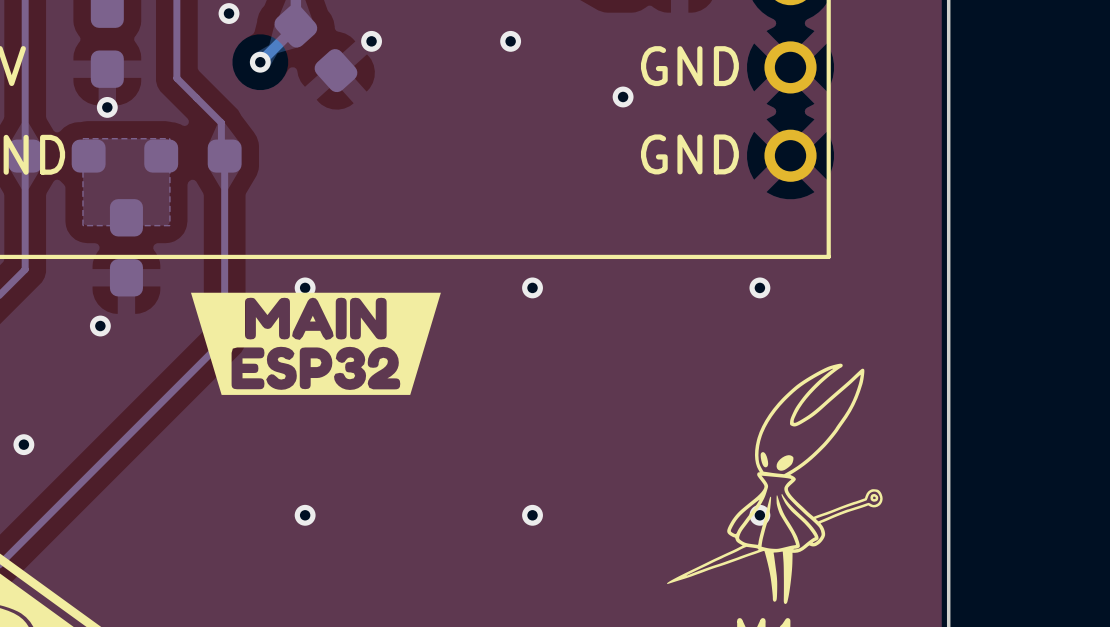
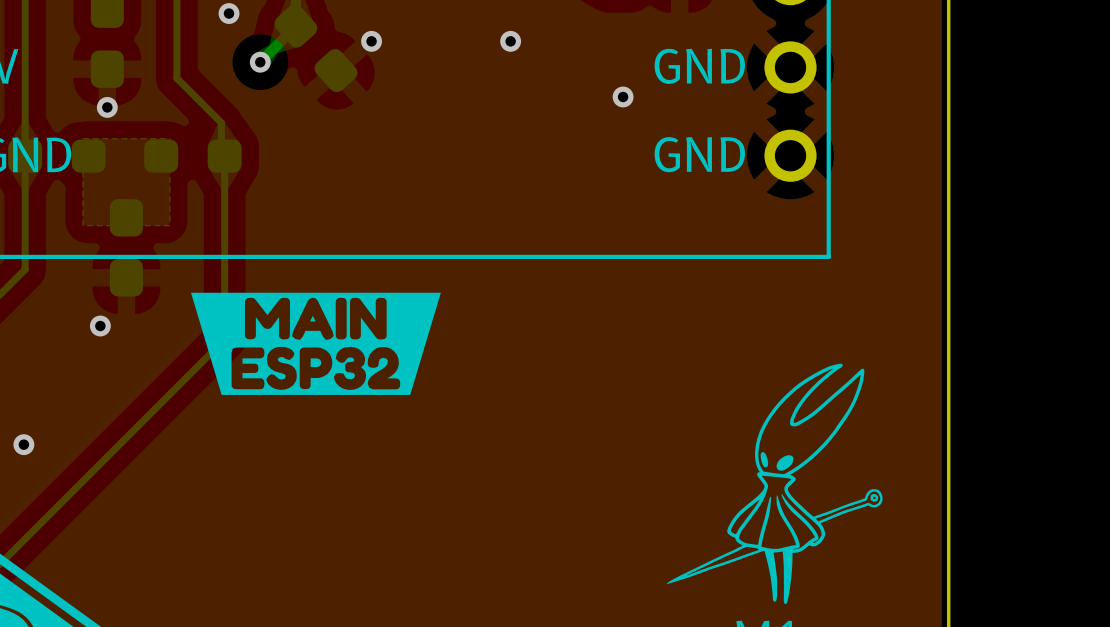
via: (305, 287) -> none
via: (532, 287) -> none
via: (759, 287) -> none
via: (305, 515) -> none
via: (532, 515) -> none
via: (759, 515) -> none

